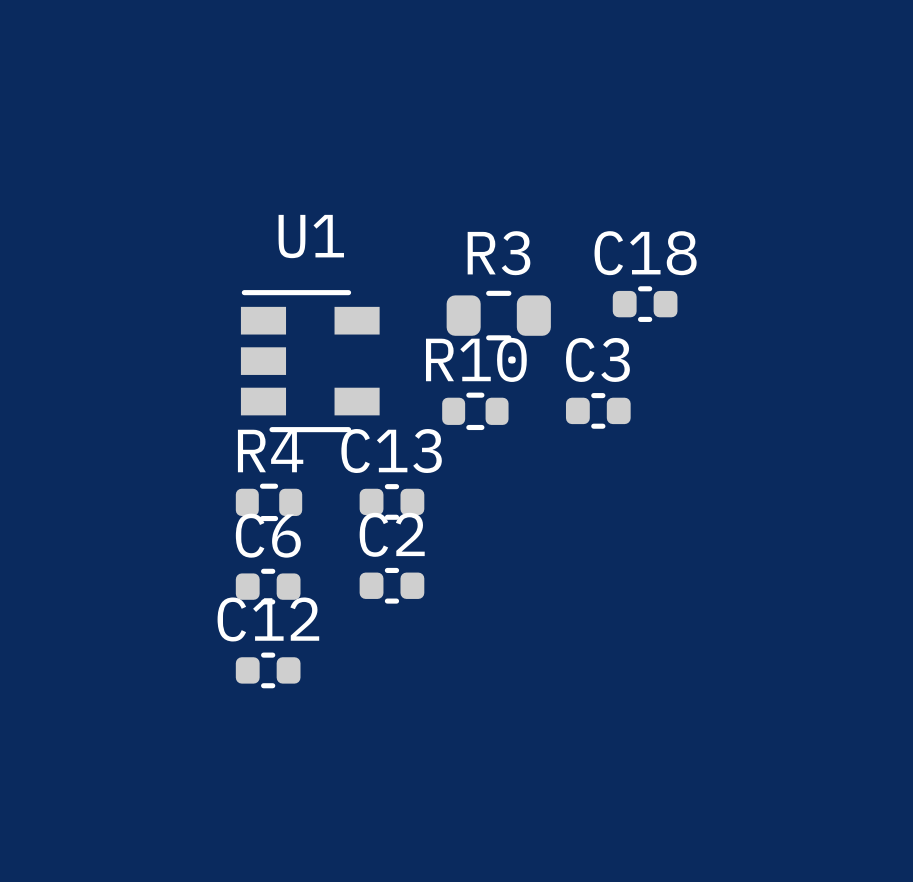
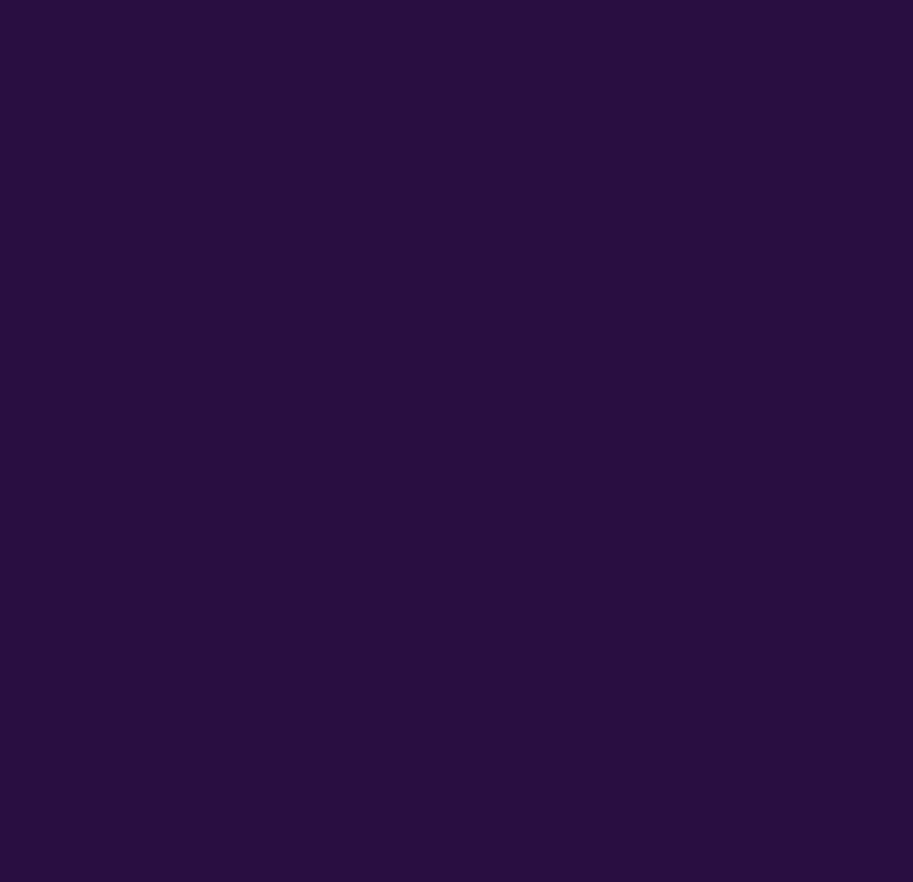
C18: (645, 304) -> none
R3: (498, 315) -> none
U1: (310, 361) -> none
C3: (598, 410) -> none
R10: (475, 411) -> none
C13: (391, 501) -> none
R4: (269, 502) -> none
C2: (391, 585) -> none
C6: (268, 586) -> none
C12: (268, 670) -> none

